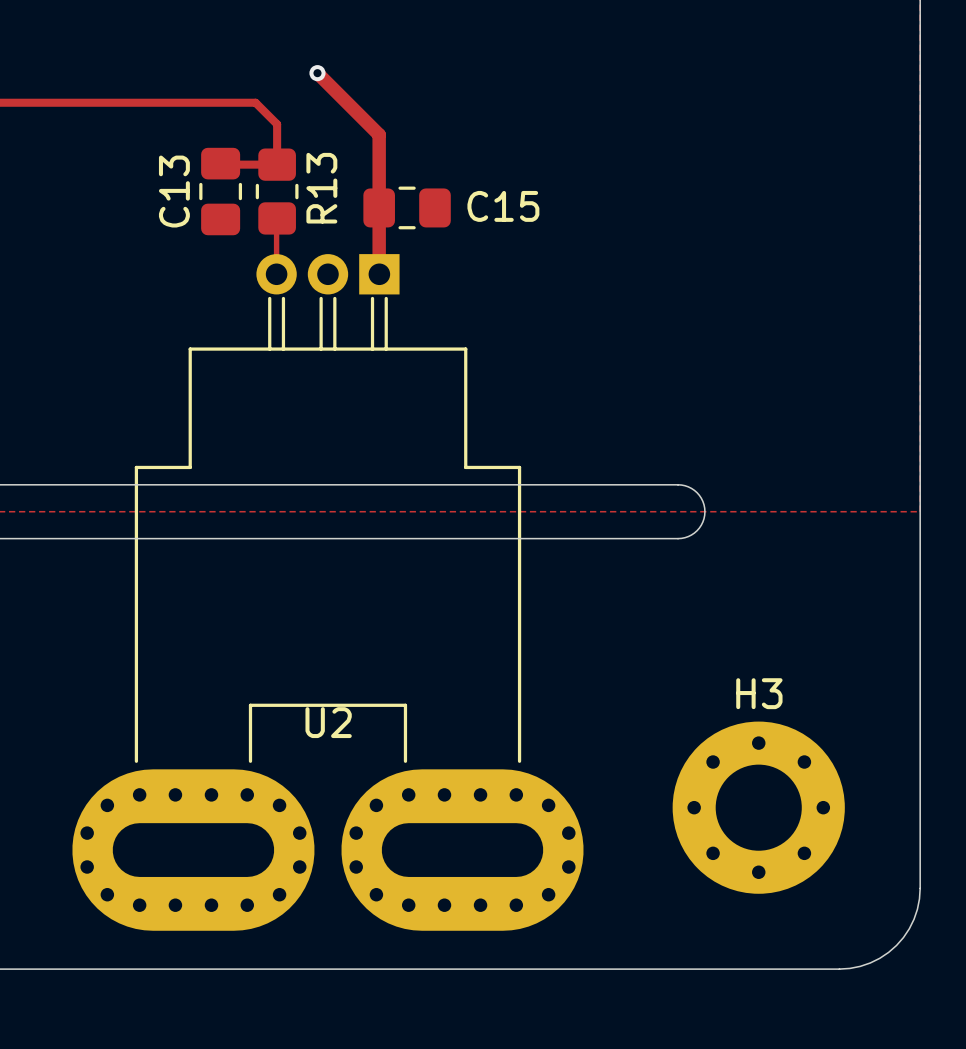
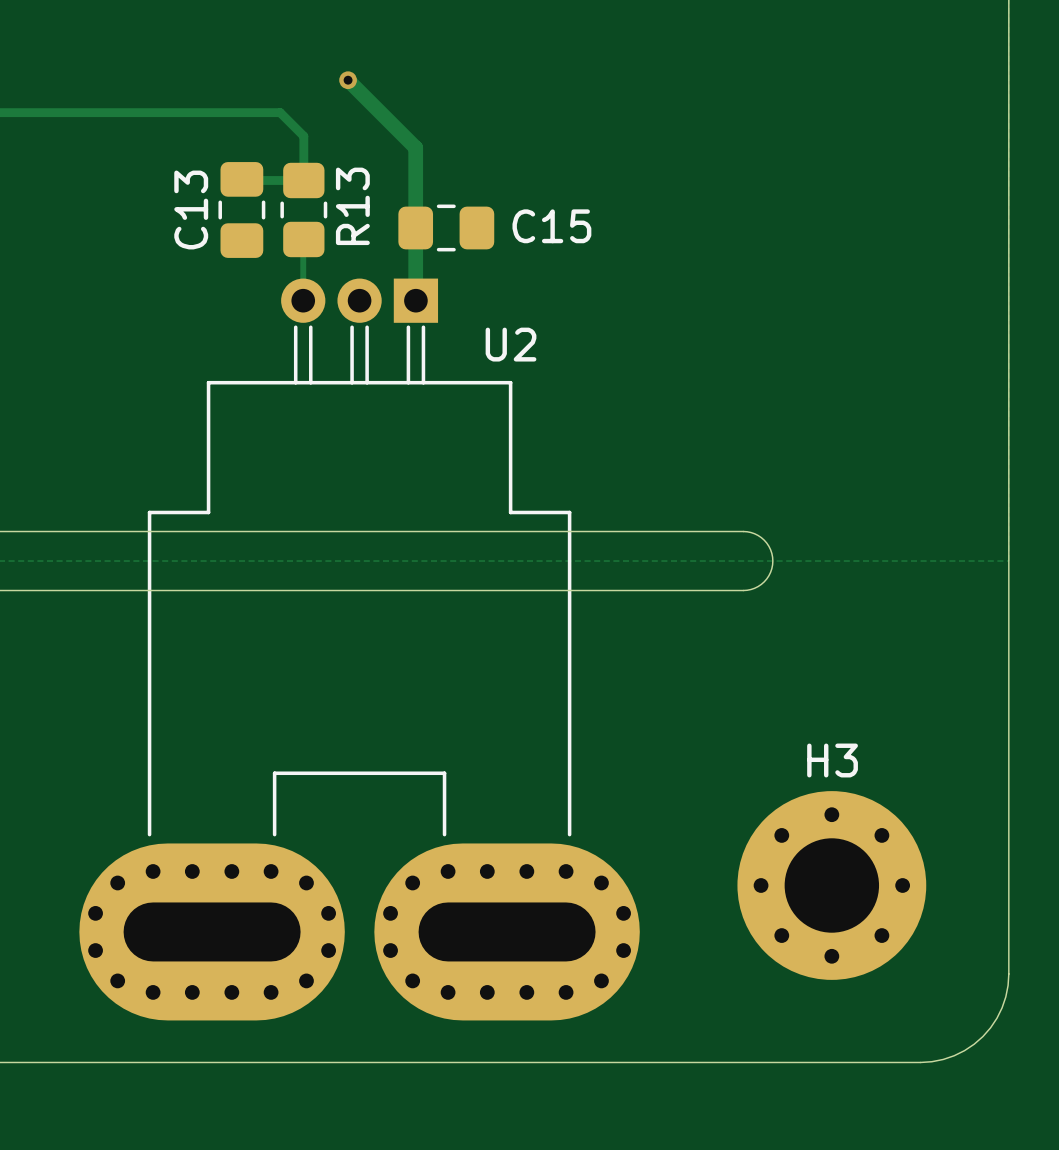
U2 name position: U2 (328, 722) -> U2 (511, 344)

